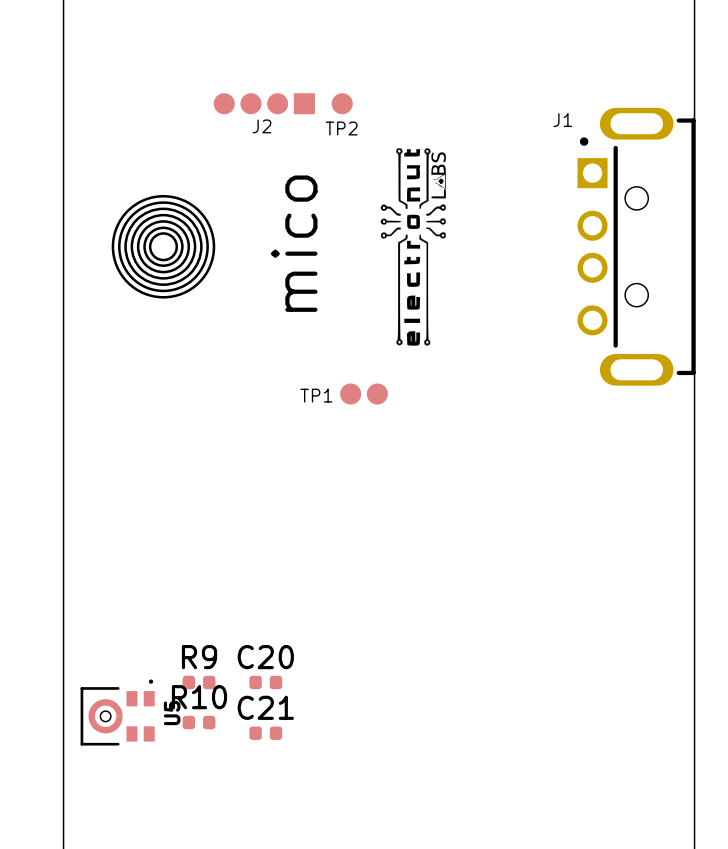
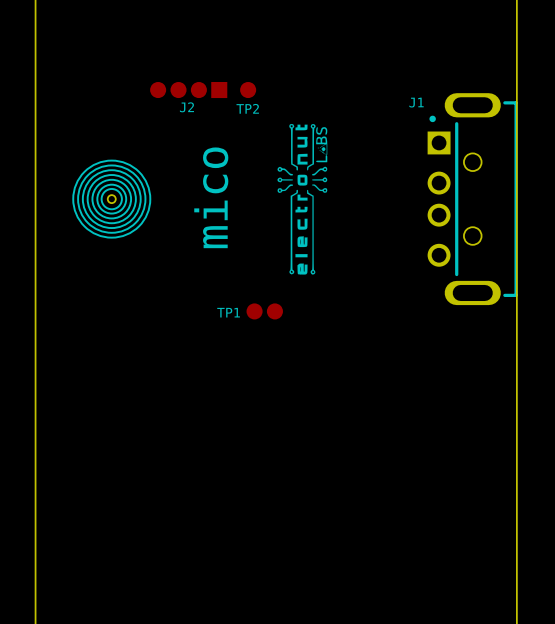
part: none -> (111, 199)
R9: (199, 682) -> none
C20: (265, 682) -> none
U5: (117, 712) -> none
R10: (199, 722) -> none
C21: (265, 733) -> none

